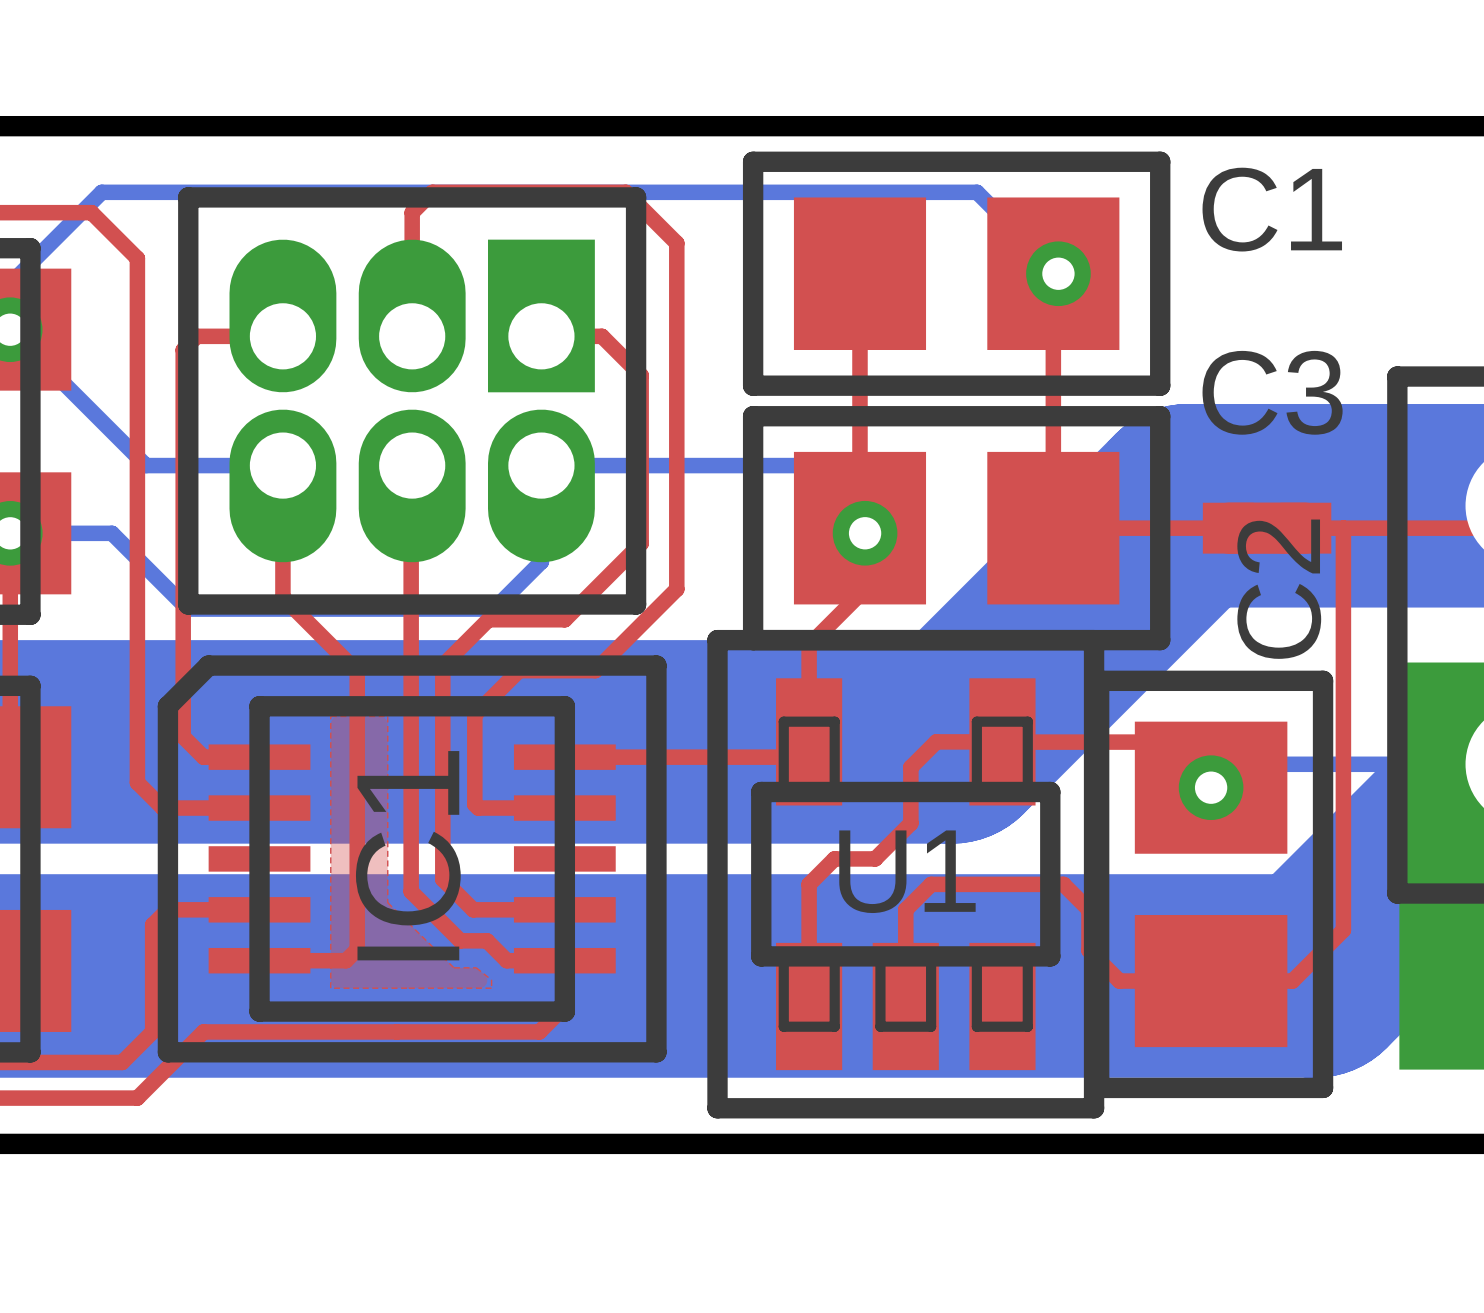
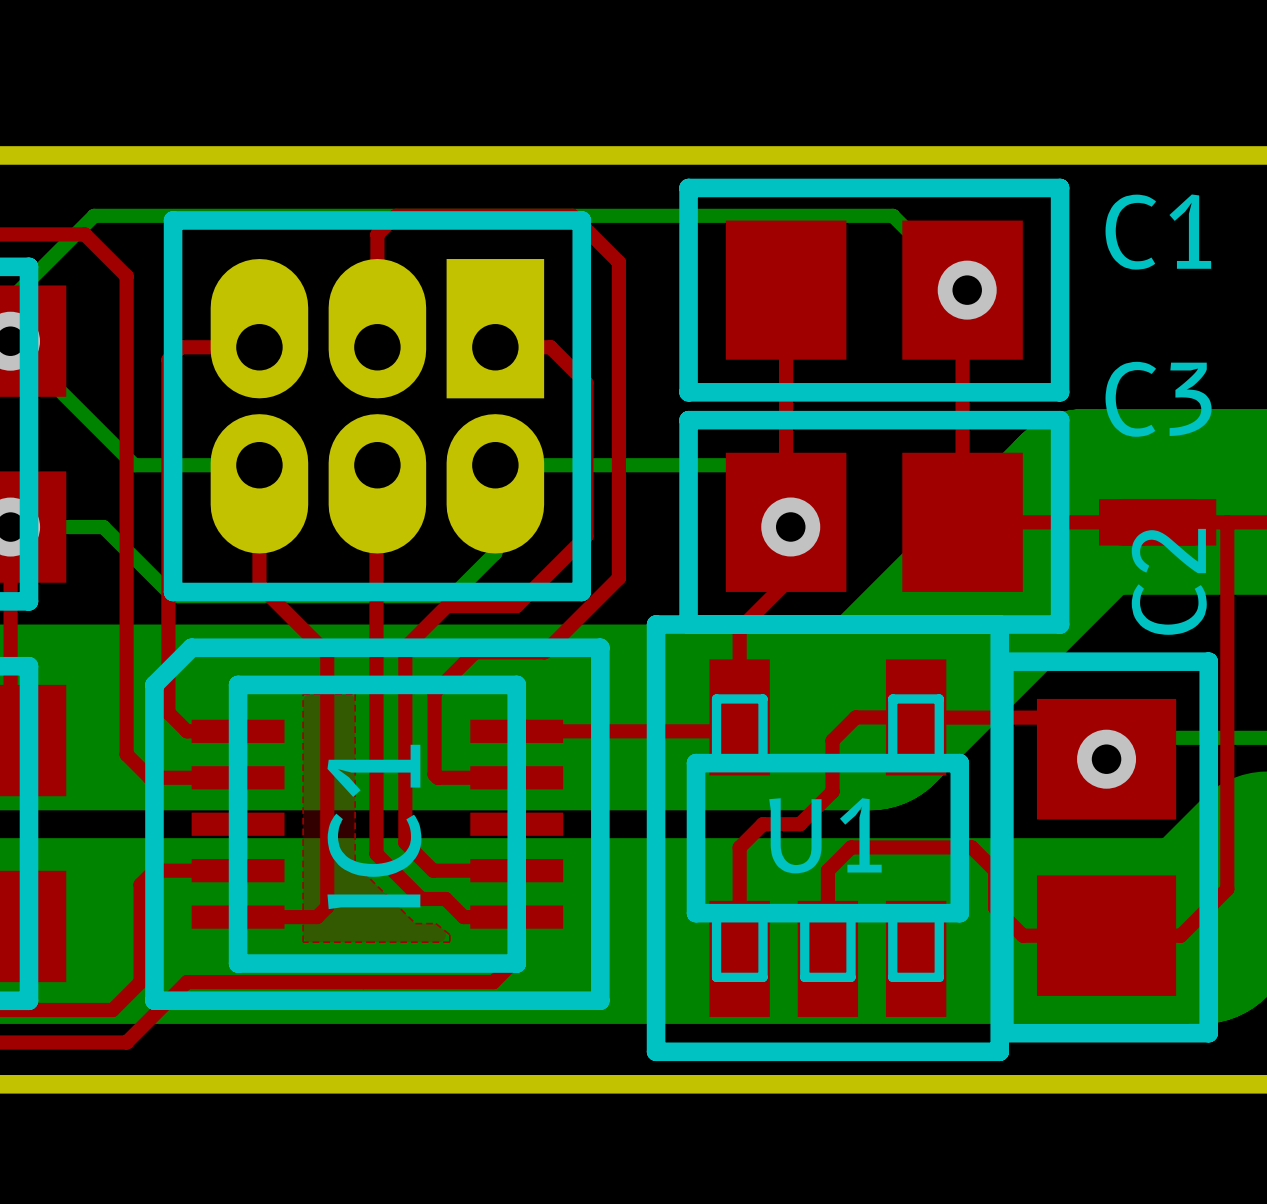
part footprint: [178, 187, 647, 615] -> [163, 211, 592, 602]

